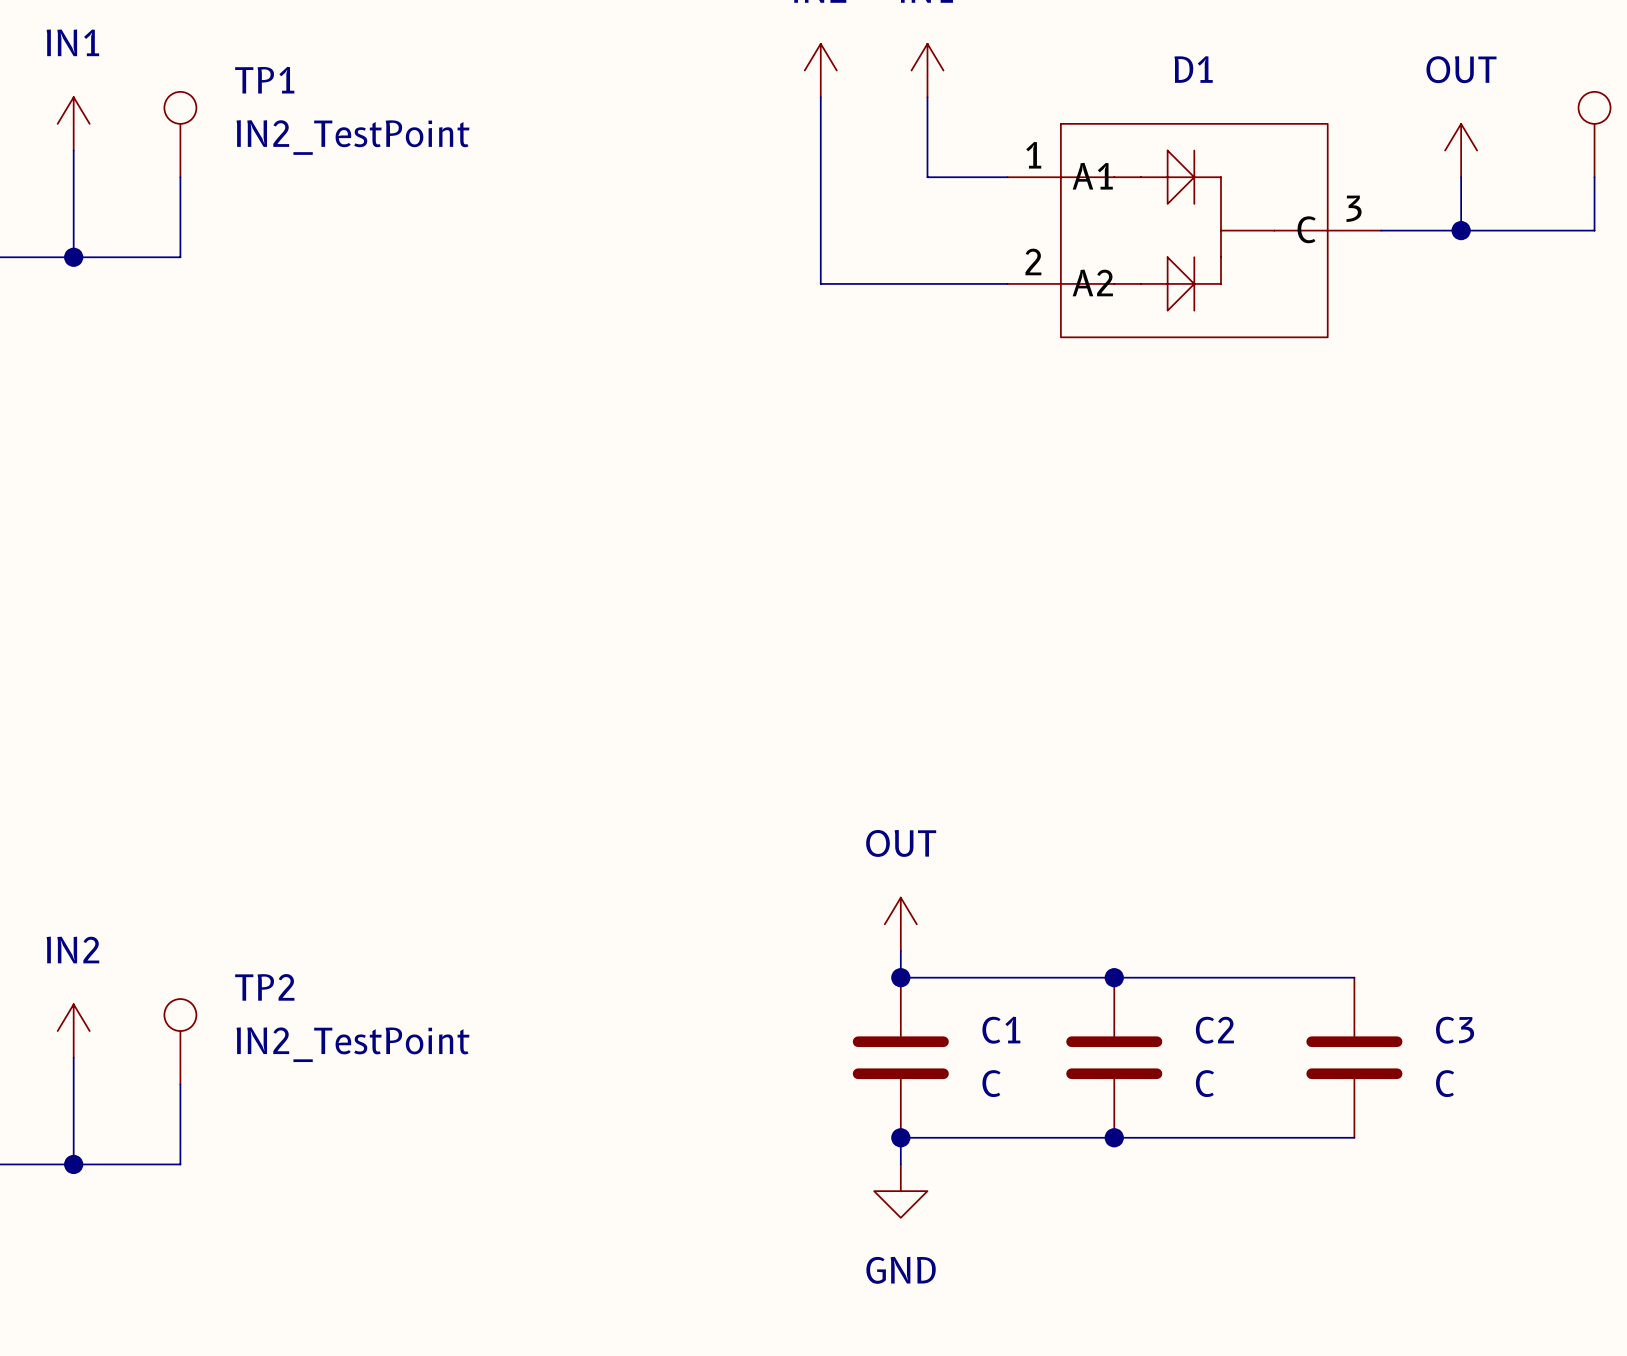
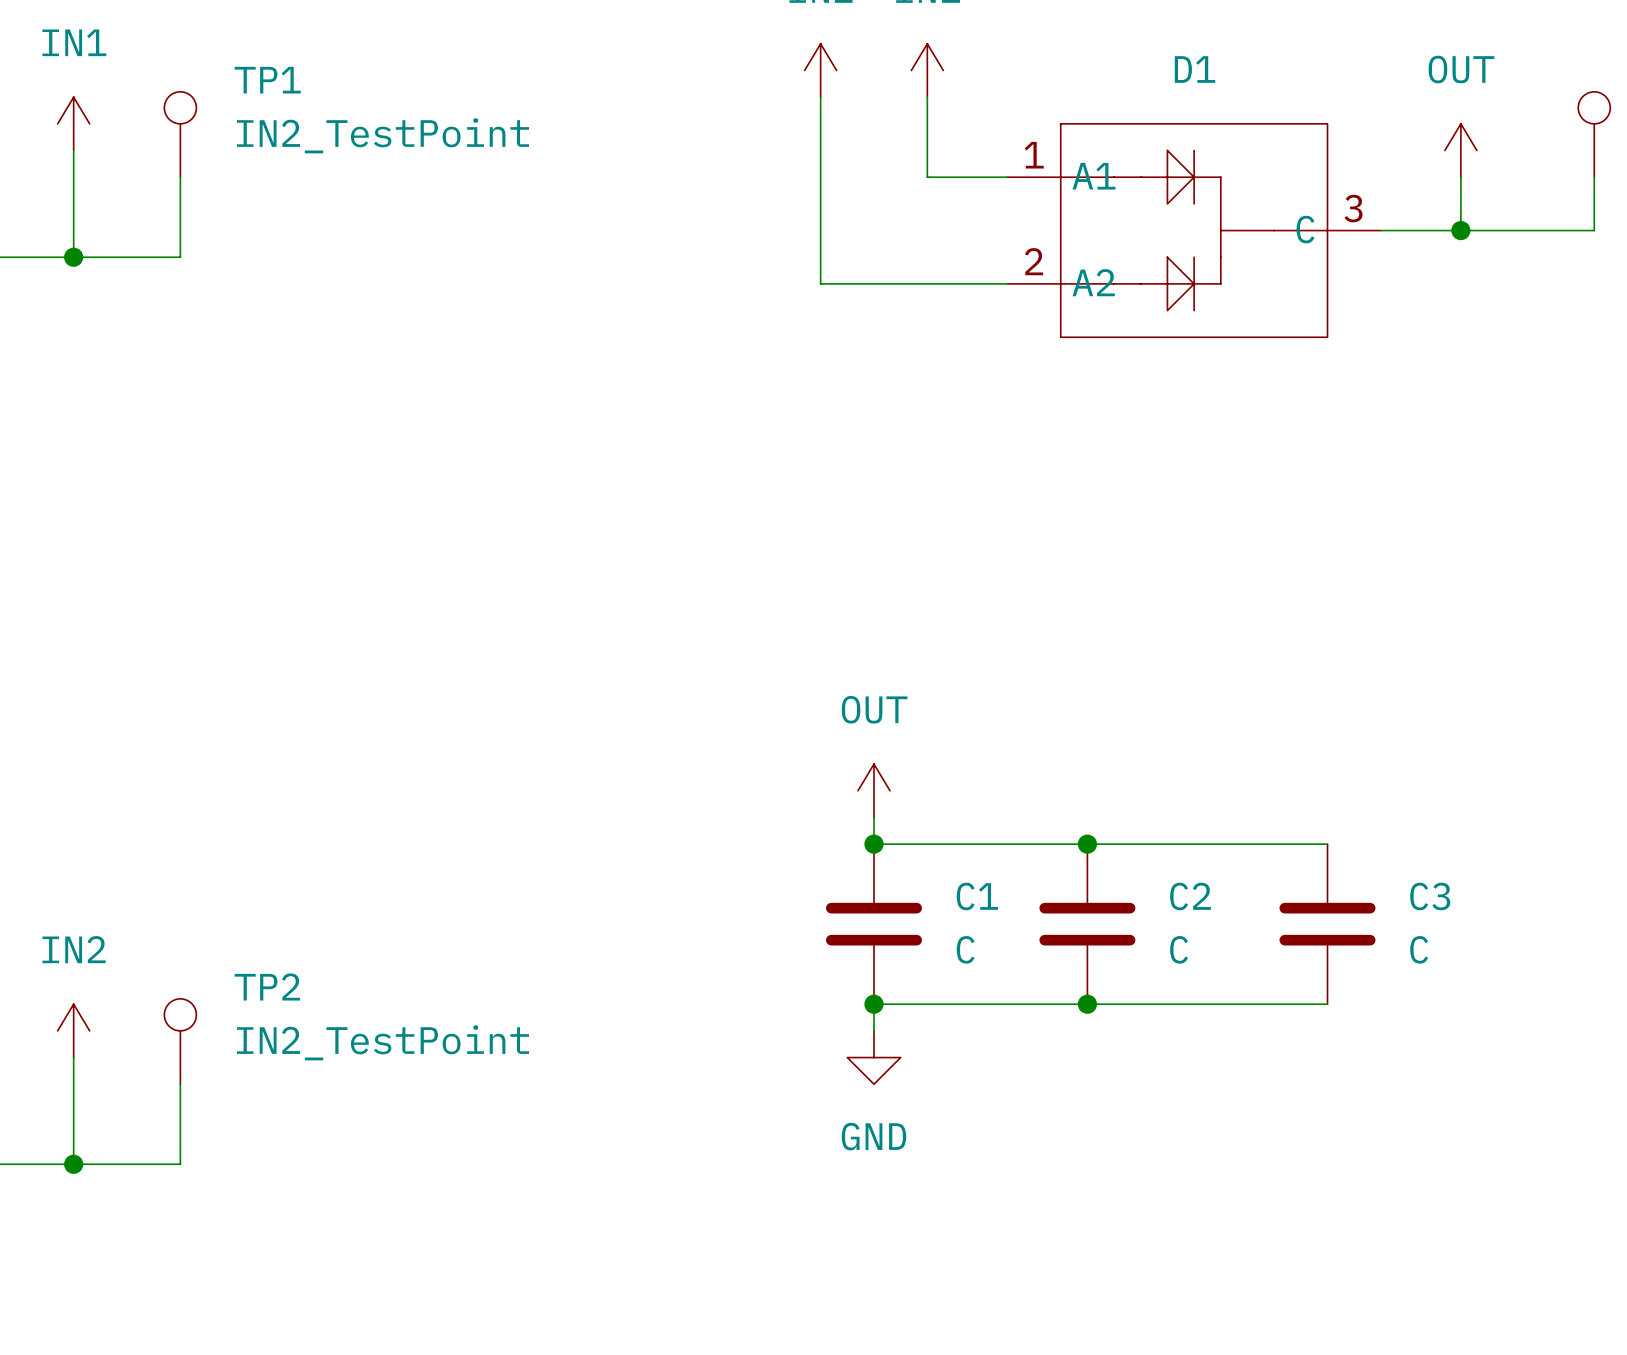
junction: none -> (873, 844)
junction: none -> (1087, 844)
power symbol position: OUT (900, 924) -> OUT (873, 790)
wire: (900, 951) (900, 977) (1354, 977) -> (873, 817) (873, 844) (1327, 844)
junction position: (900, 977) -> (873, 1004)
junction position: (1114, 977) -> (1087, 1004)
C1 position: (900, 1057) -> (873, 924)
C2 position: (1114, 1057) -> (1087, 924)
C3 position: (1354, 1057) -> (1327, 924)
junction: (900, 1137) -> none
junction: (1114, 1137) -> none
wire: (1354, 1137) (900, 1137) (900, 1164) -> (1327, 1004) (873, 1004) (873, 1030)
power symbol position: GND (900, 1191) -> GND (873, 1057)

